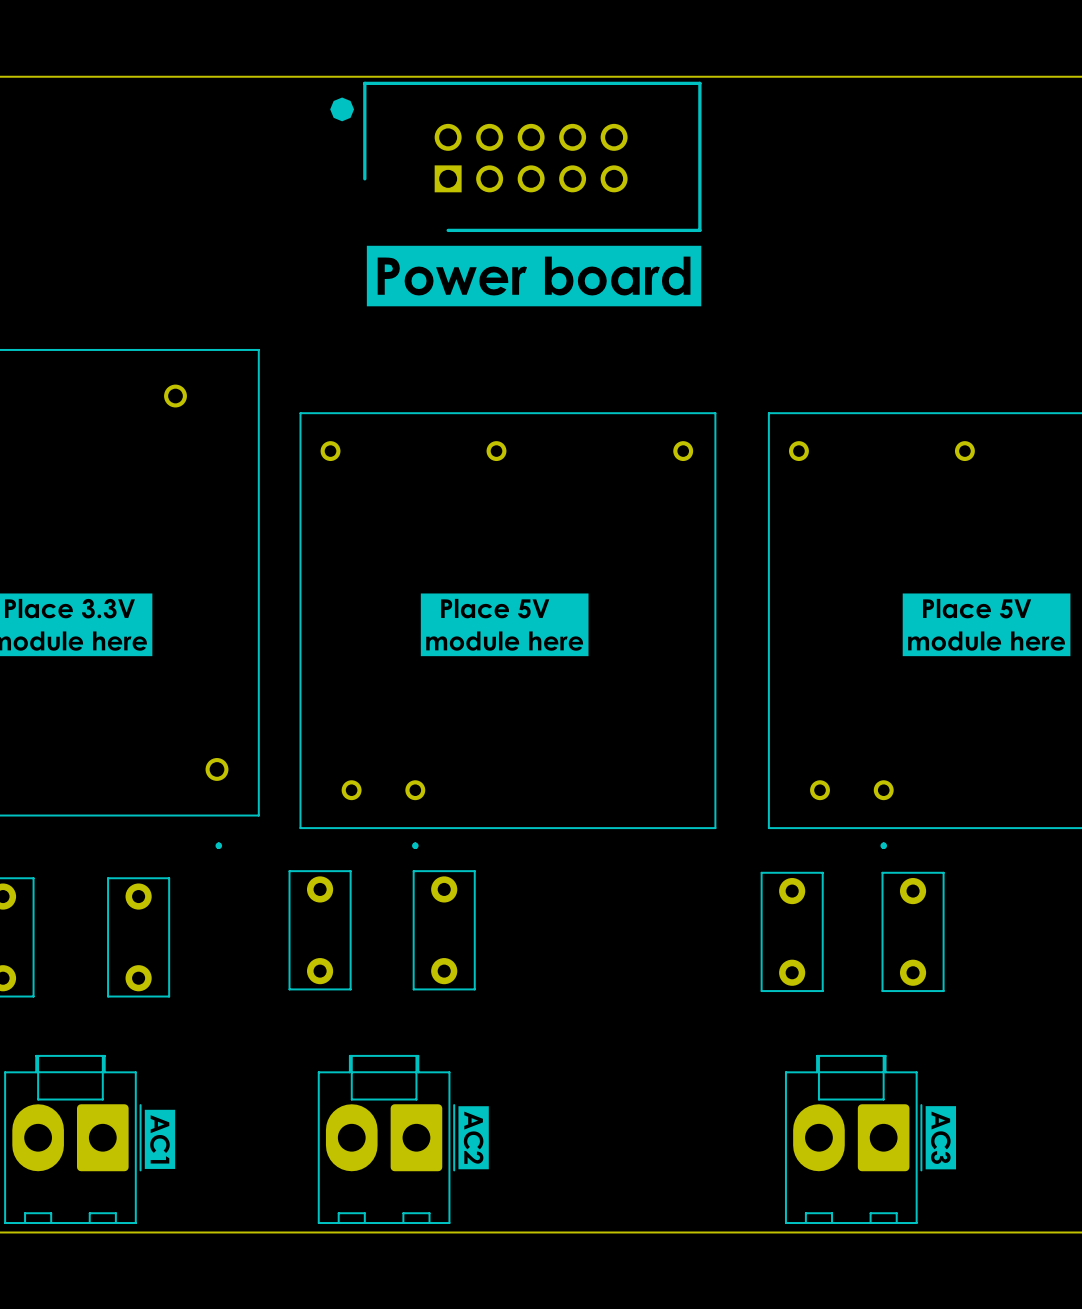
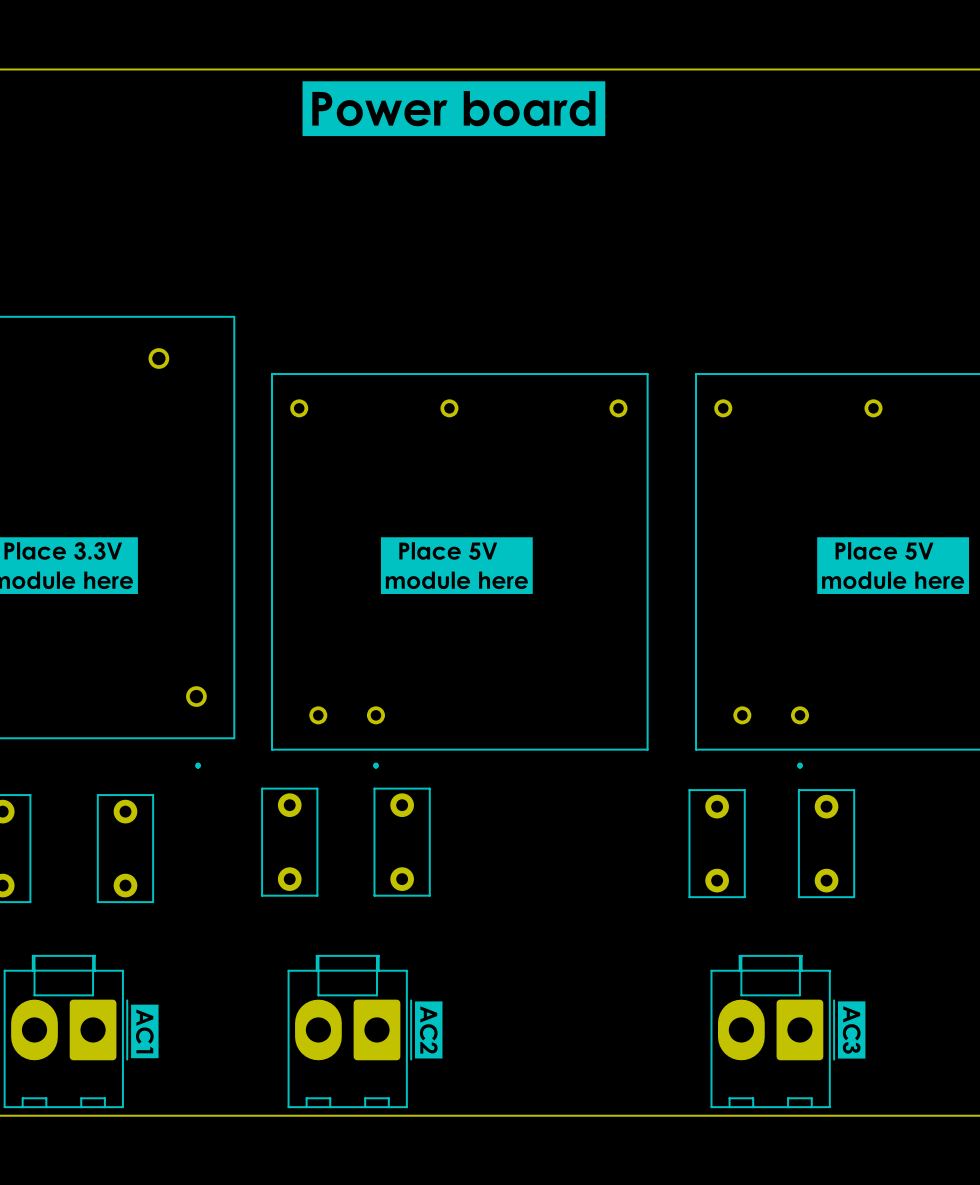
drawing: [330, 97, 355, 122] -> none
part: (532, 156) -> none
drawing position: (534, 276) -> (453, 108)

